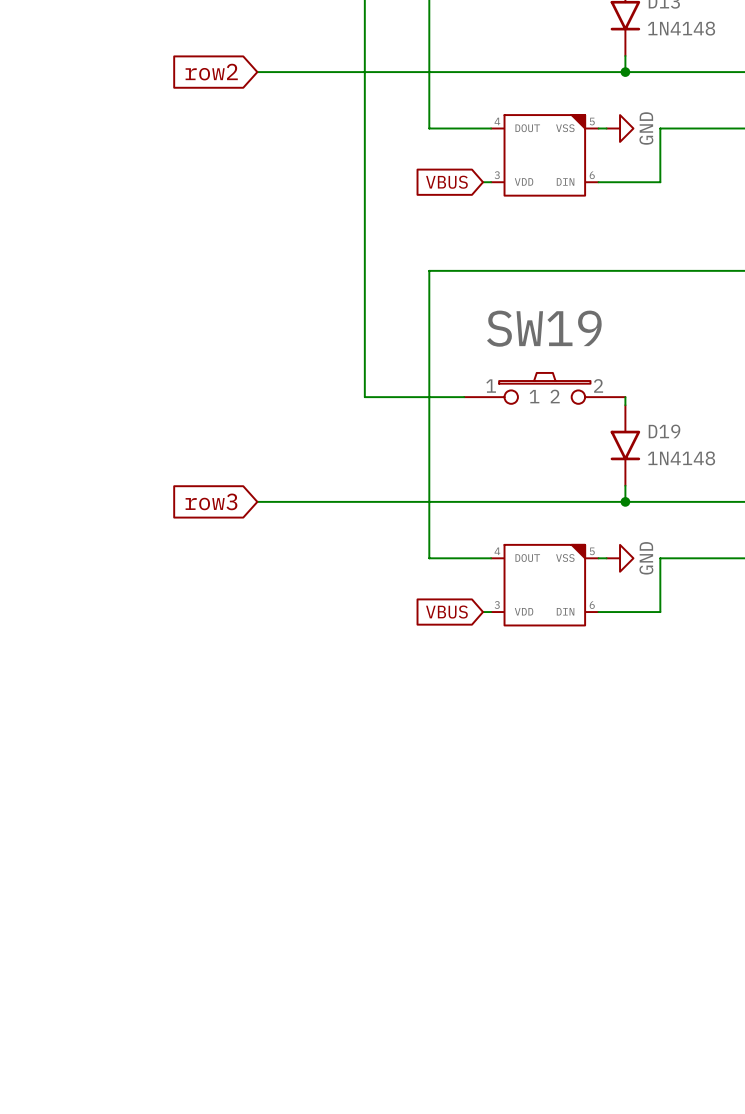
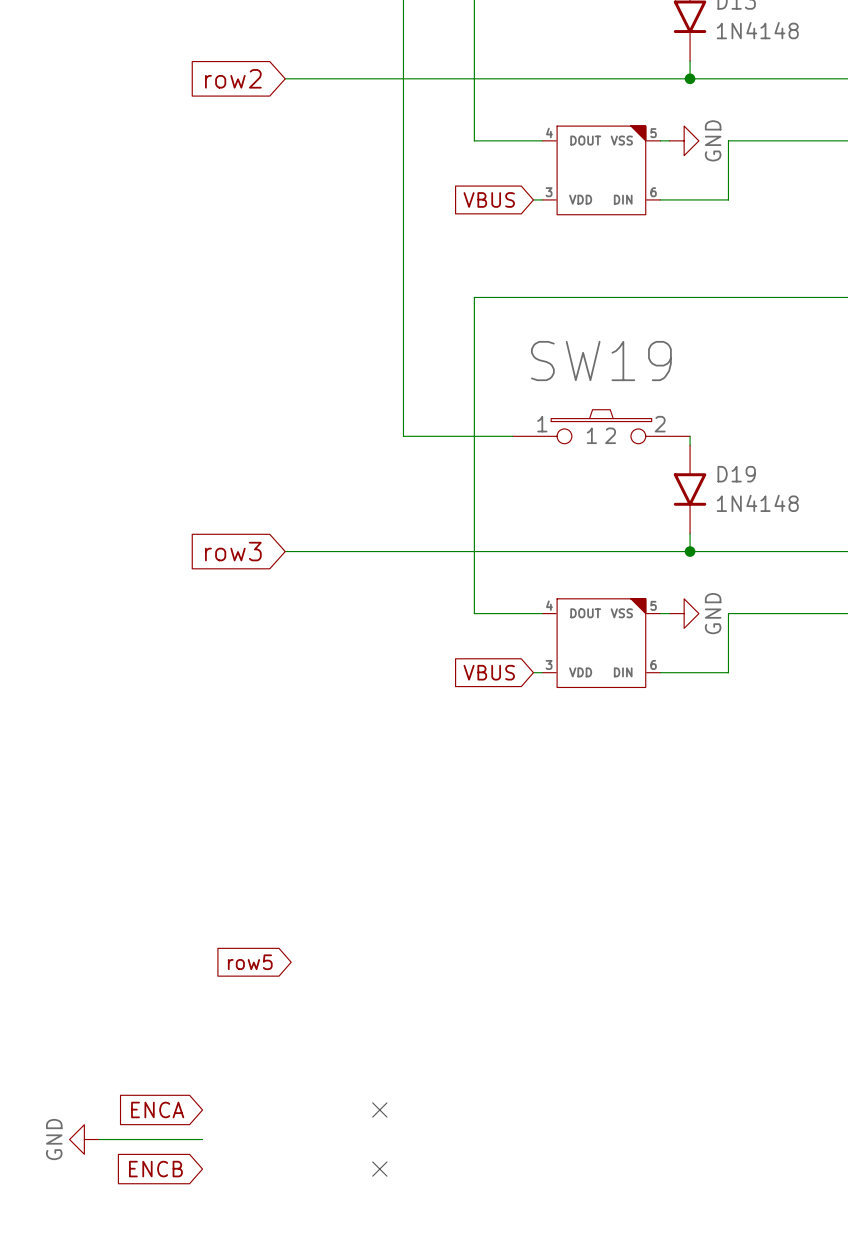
global label: none -> row5 (250, 962)
global label: none -> ENCA (157, 1109)
no-connect mark: none -> (379, 1109)
power symbol: none -> GND (84, 1139)
wire: none -> (99, 1139) (202, 1139)
global label: none -> ENCB (155, 1169)
no-connect mark: none -> (379, 1169)

